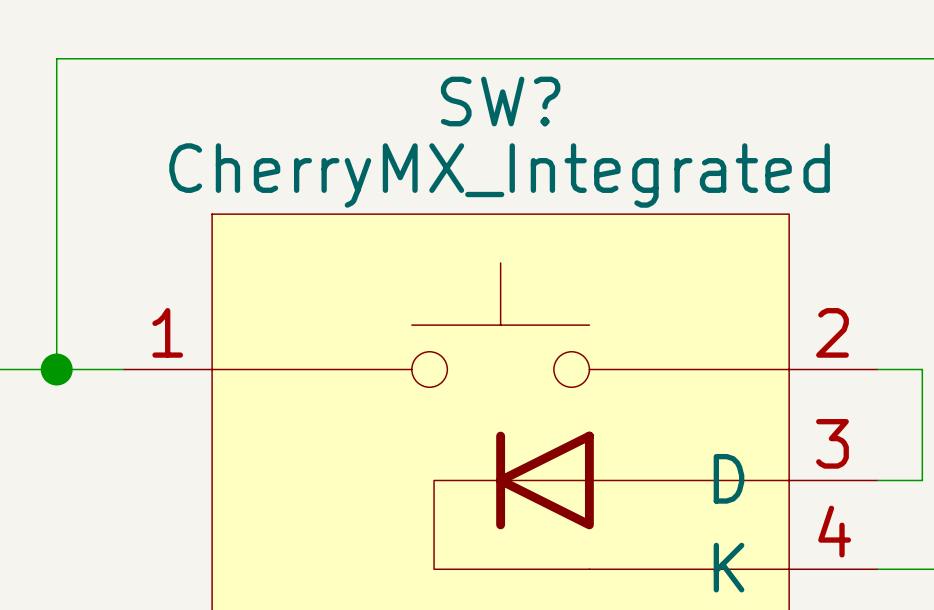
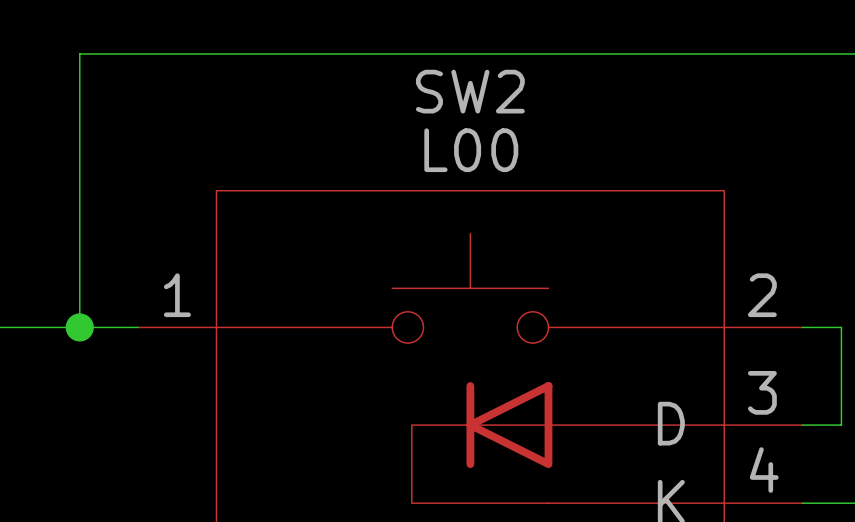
SW? name: SW? (500, 101) -> SW2 (470, 91)
SW? value: CherryMX_Integrated (499, 175) -> L00 (471, 150)

